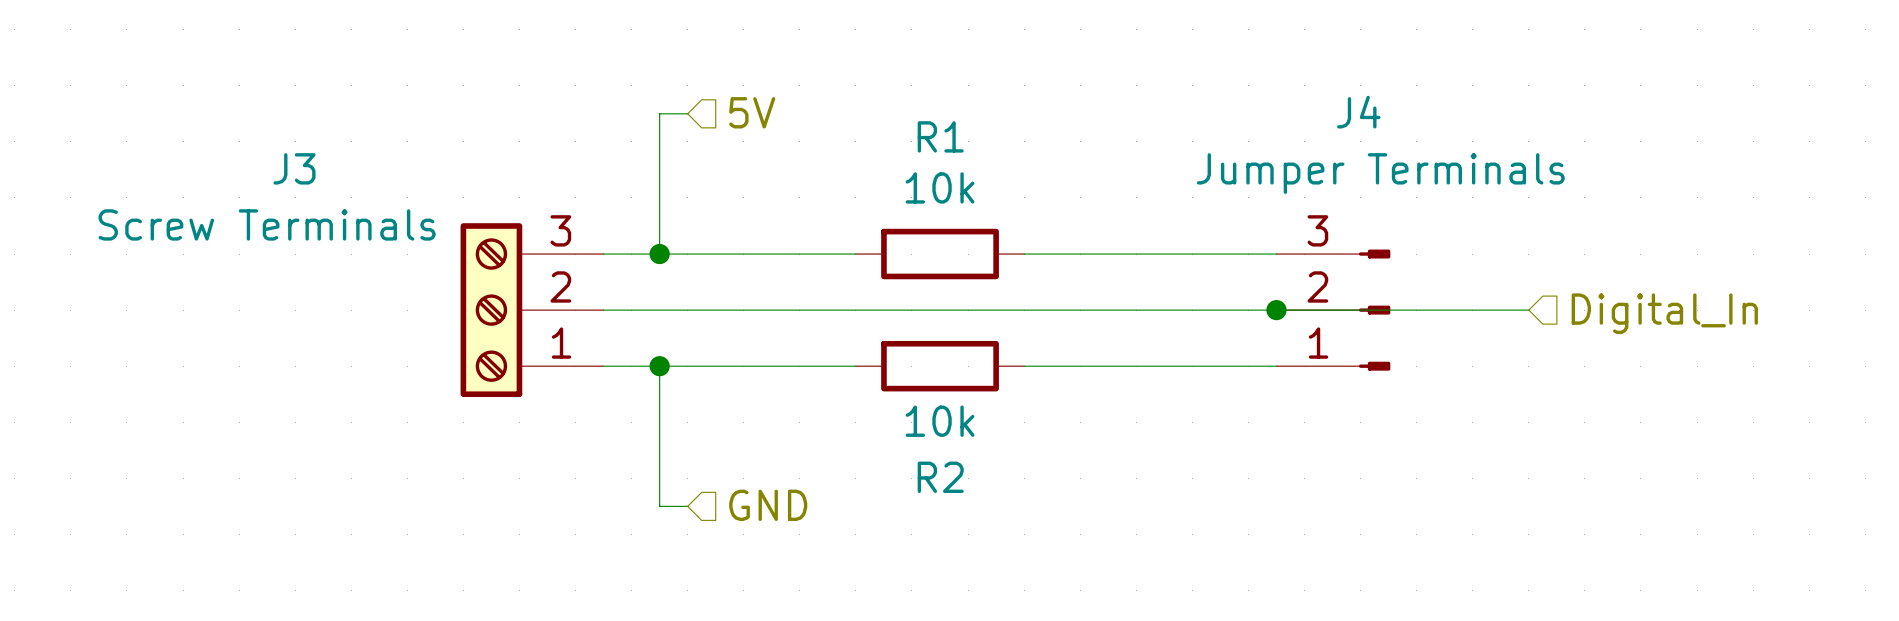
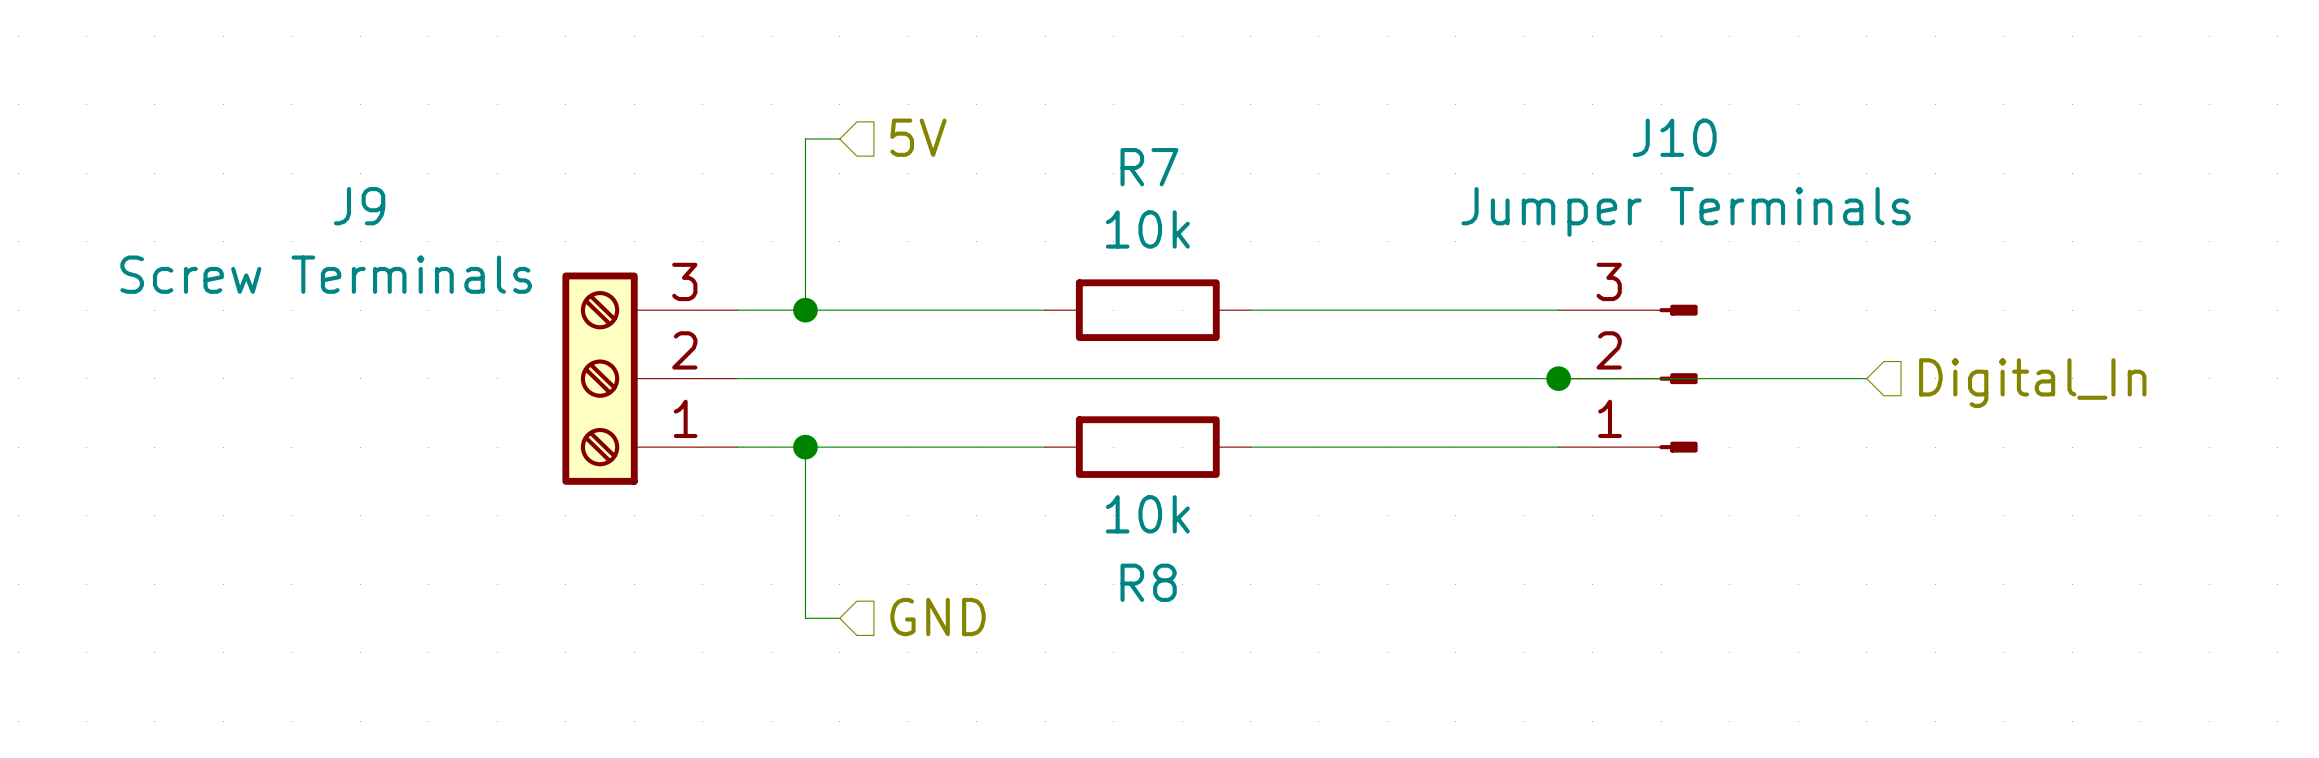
J4 name: J4 (1358, 112) -> J10 (1674, 137)
R1 name: R1 (940, 136) -> R7 (1149, 167)
J3 name: J3 (294, 168) -> J9 (359, 206)
R2 name: R2 (940, 477) -> R8 (1148, 582)

